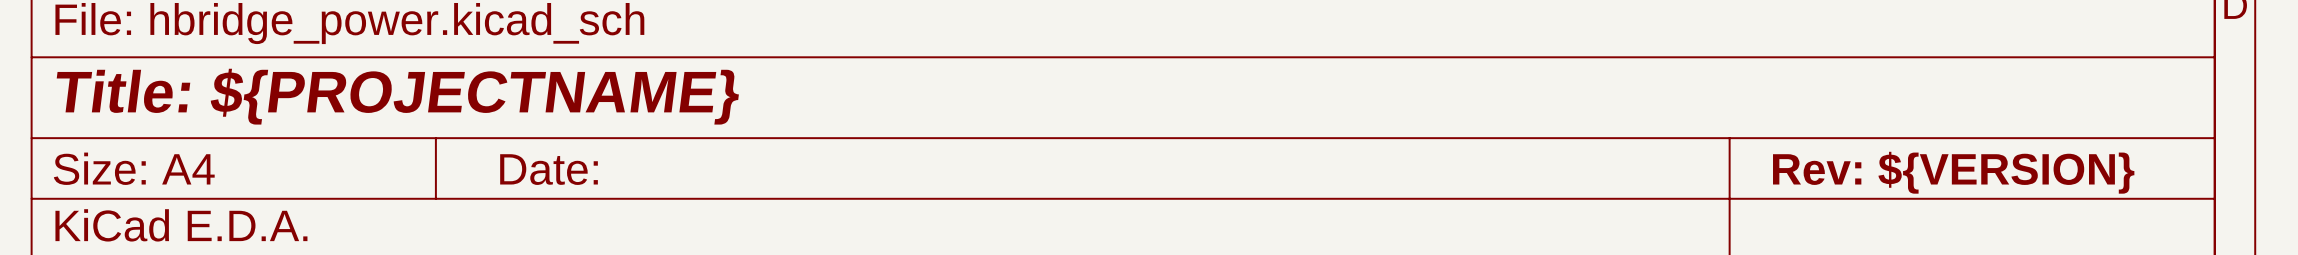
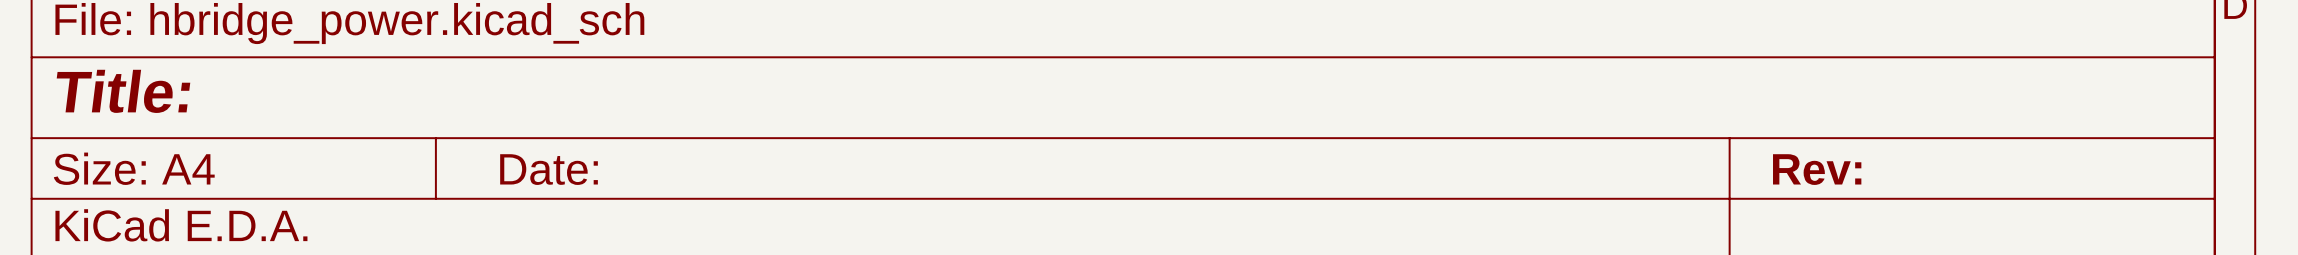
title block: Title: ${PROJECTNAME} (397, 96) -> Title: (123, 91)
title block: Rev: ${VERSION} (1953, 172) -> Rev: (1817, 169)

